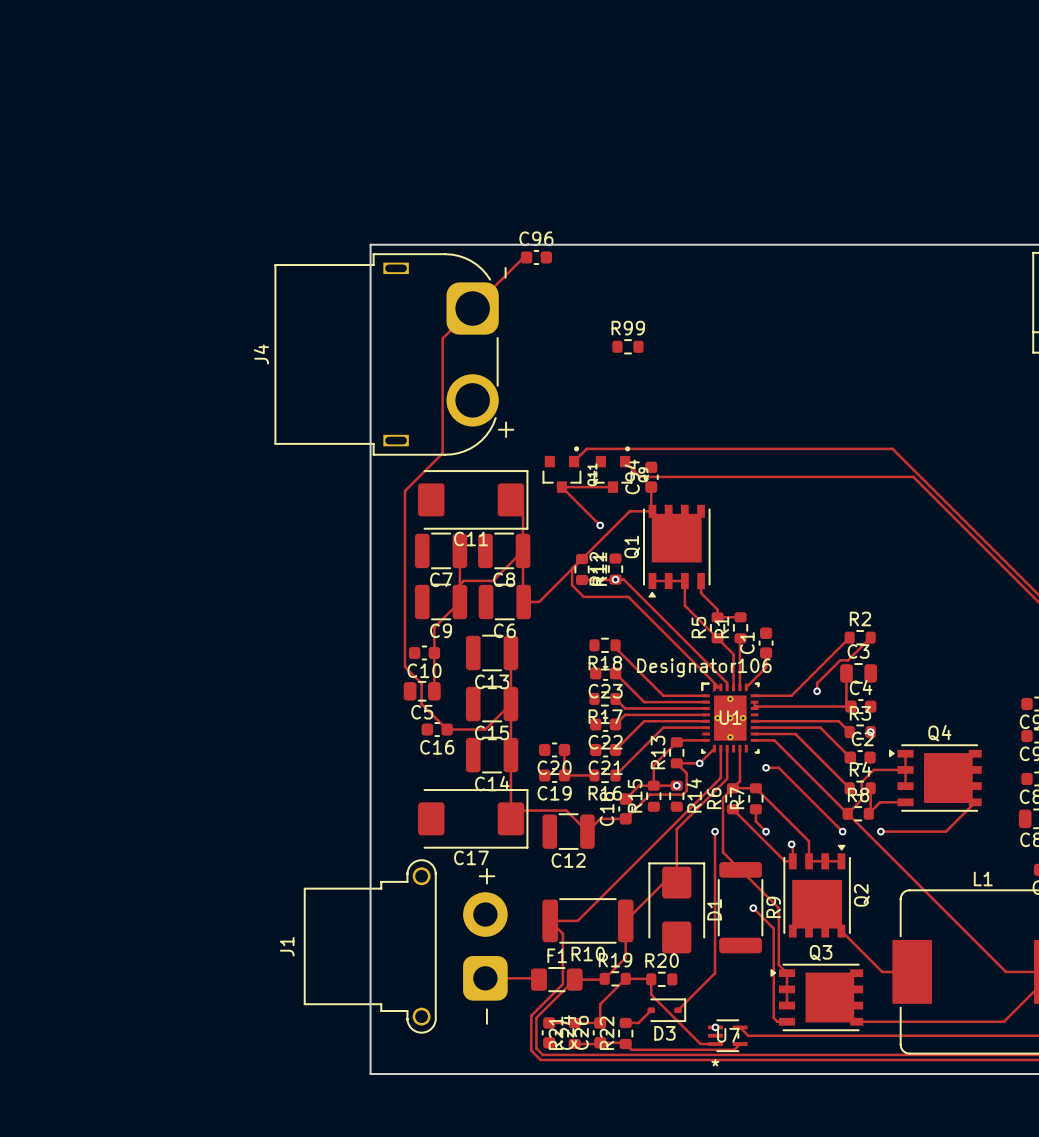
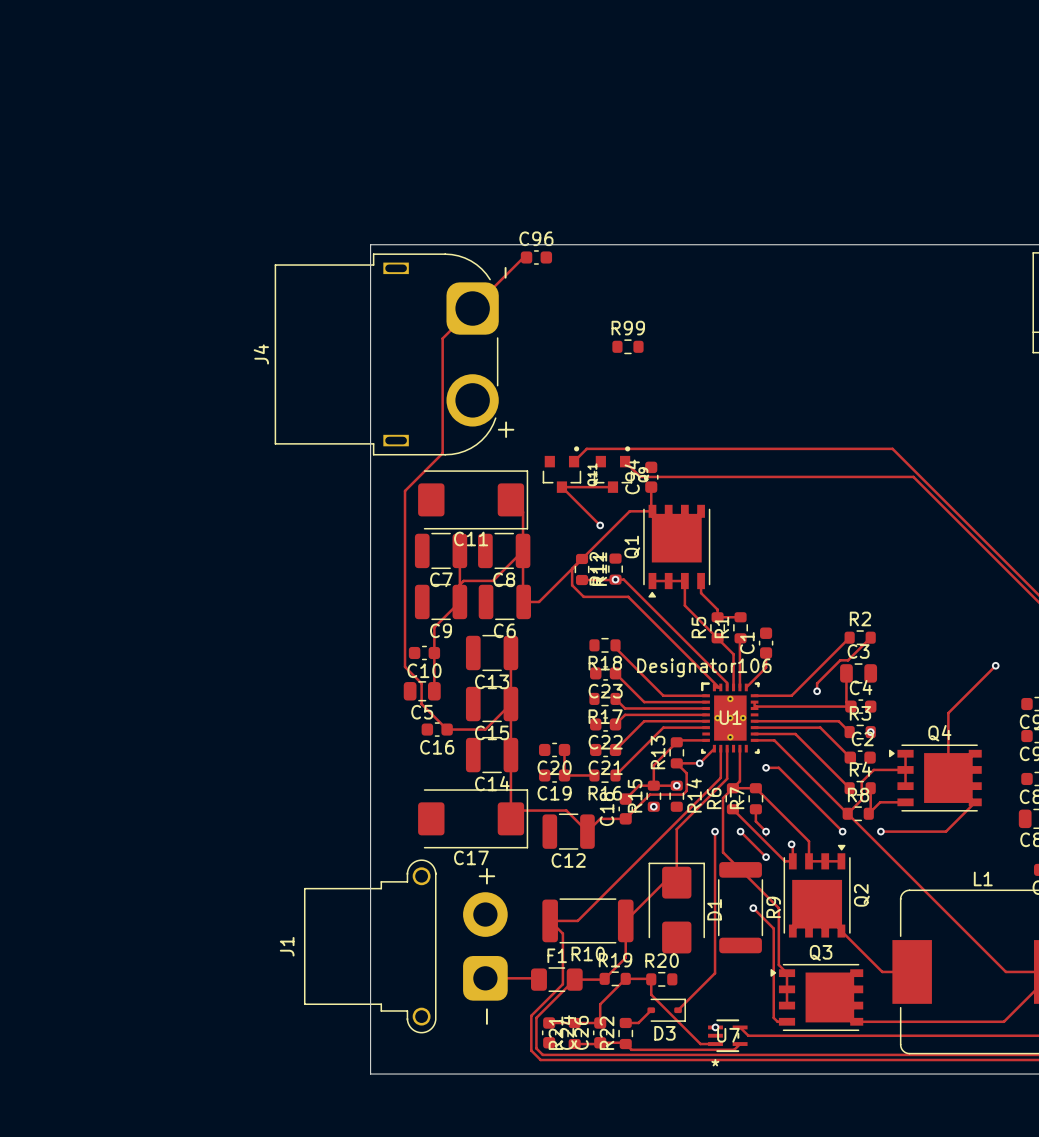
track: none -> (995, 665) (948, 713) (948, 778)
via: none -> (995, 665)
via: none -> (653, 806)
track: none -> (740, 831) (766, 857)
via: none -> (740, 831)
via: none -> (766, 857)

